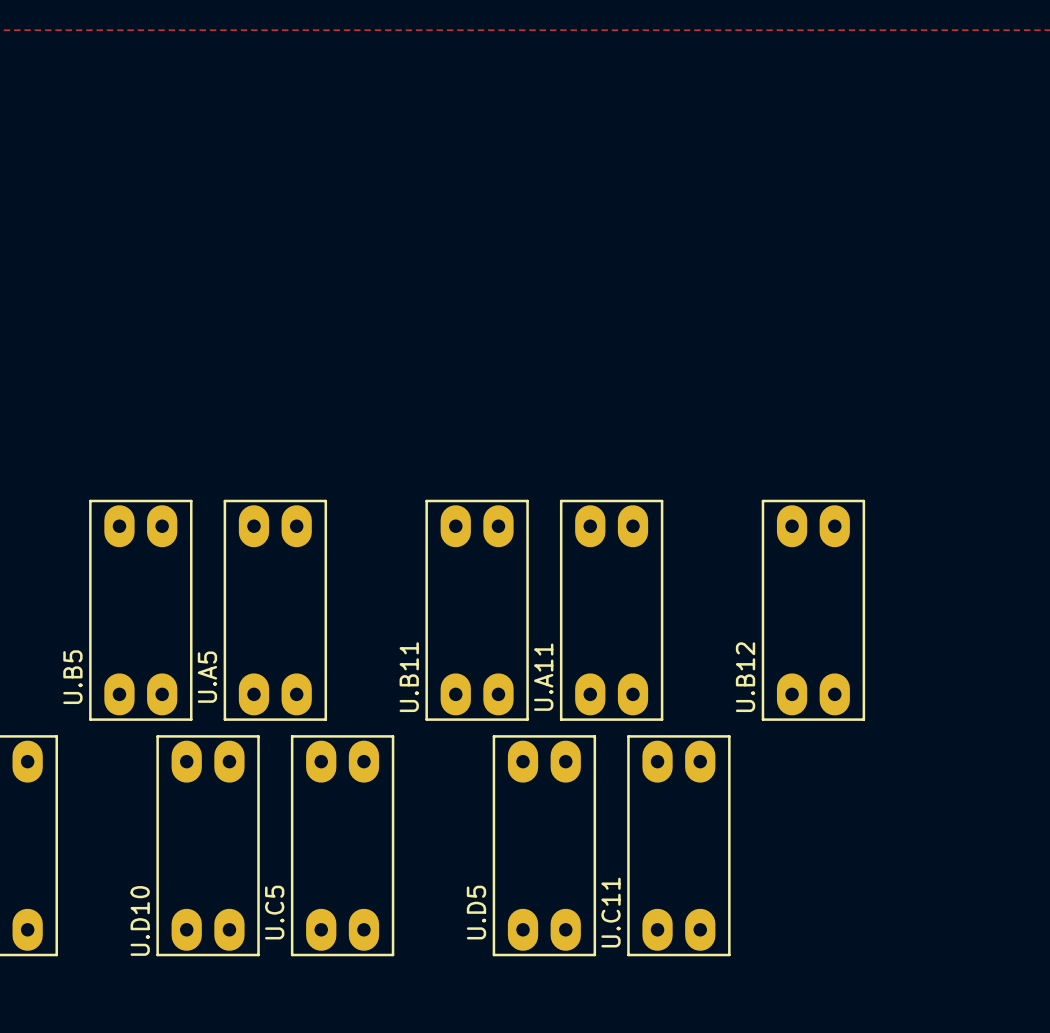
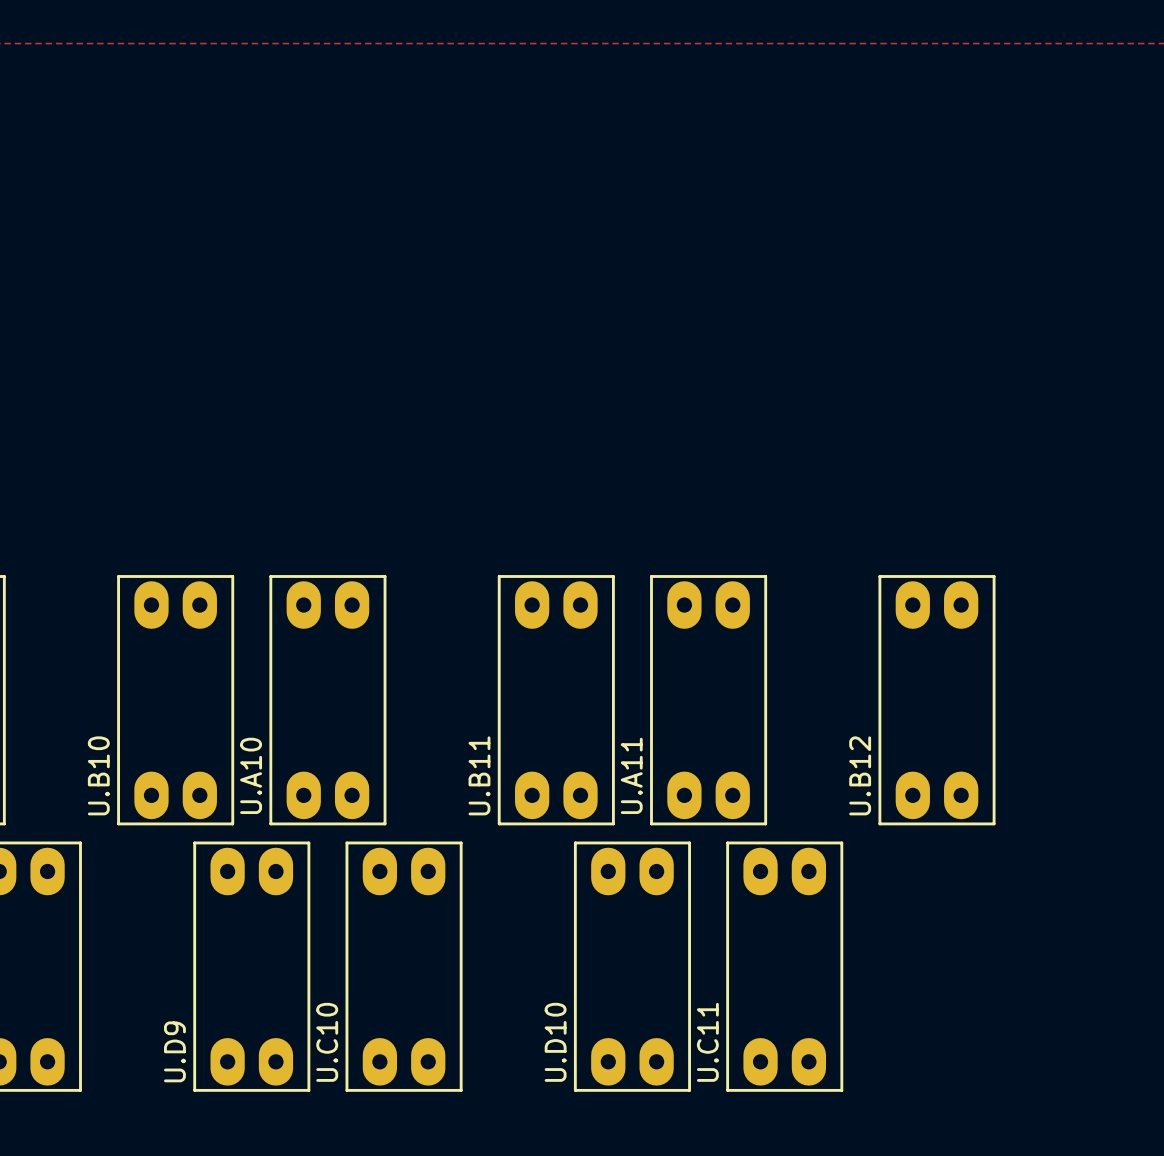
U.B5 name: U.B5 (72, 677) -> U.B10 (98, 775)
U.A5 name: U.A5 (207, 677) -> U.A10 (251, 775)
U.C5 name: U.C5 (274, 912) -> U.C10 (327, 1042)
U.D5 name: U.D5 (476, 912) -> U.D10 (555, 1042)
U.D10 name: U.D10 (140, 920) -> U.D9 (174, 1051)

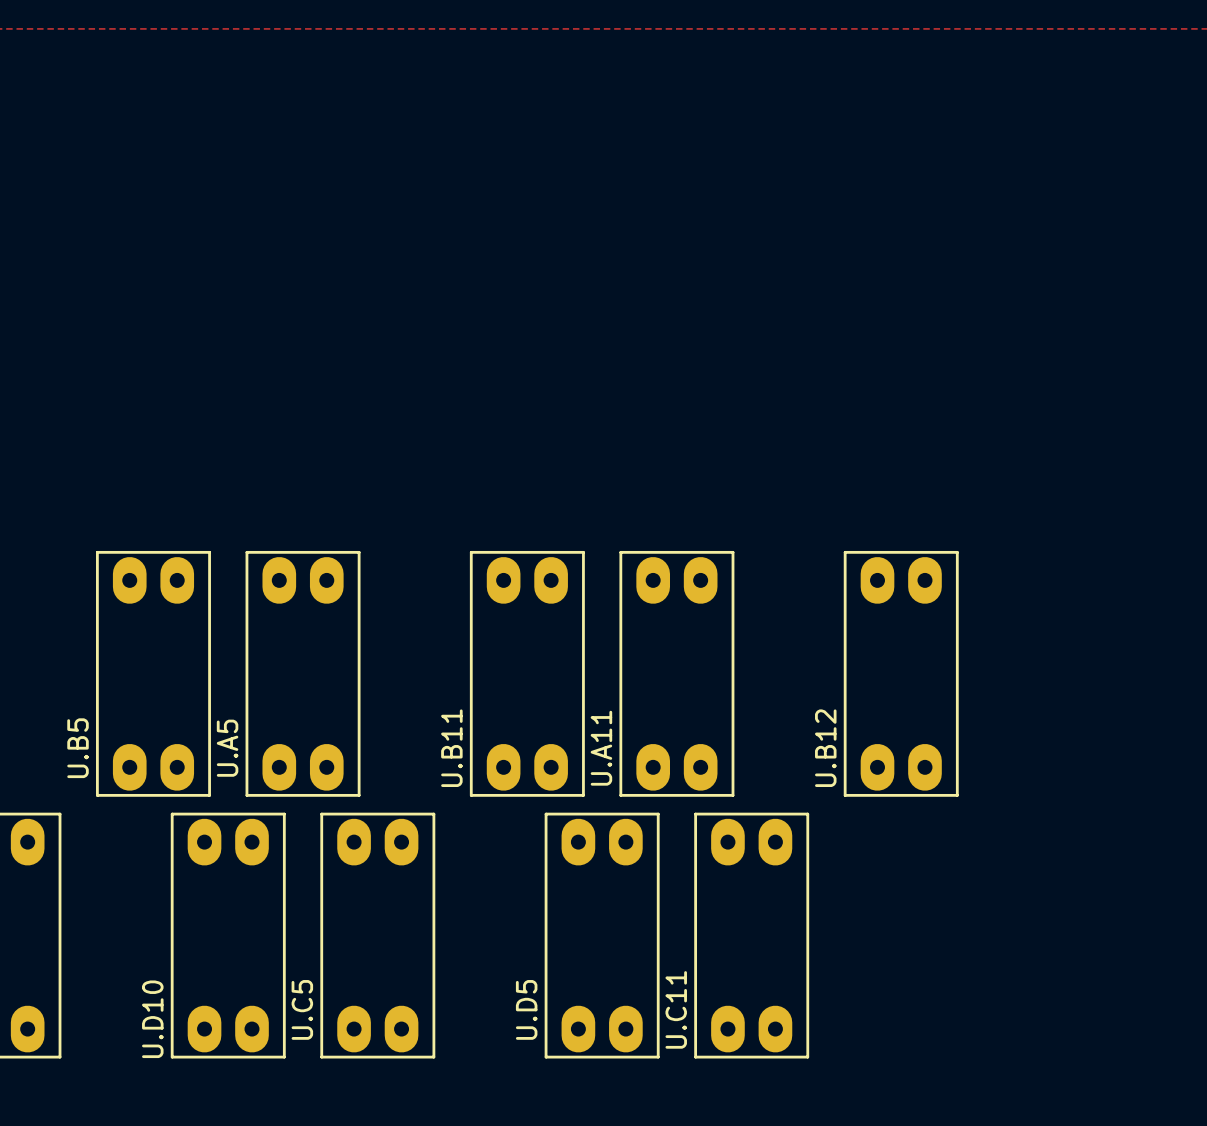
U.B10 name: U.B10 (98, 775) -> U.B5 (78, 748)
U.A10 name: U.A10 (251, 775) -> U.A5 (227, 748)
U.C10 name: U.C10 (327, 1042) -> U.C5 (302, 1009)
U.D10 name: U.D10 (555, 1042) -> U.D5 (526, 1009)
U.D9 name: U.D9 (174, 1051) -> U.D10 (152, 1019)

